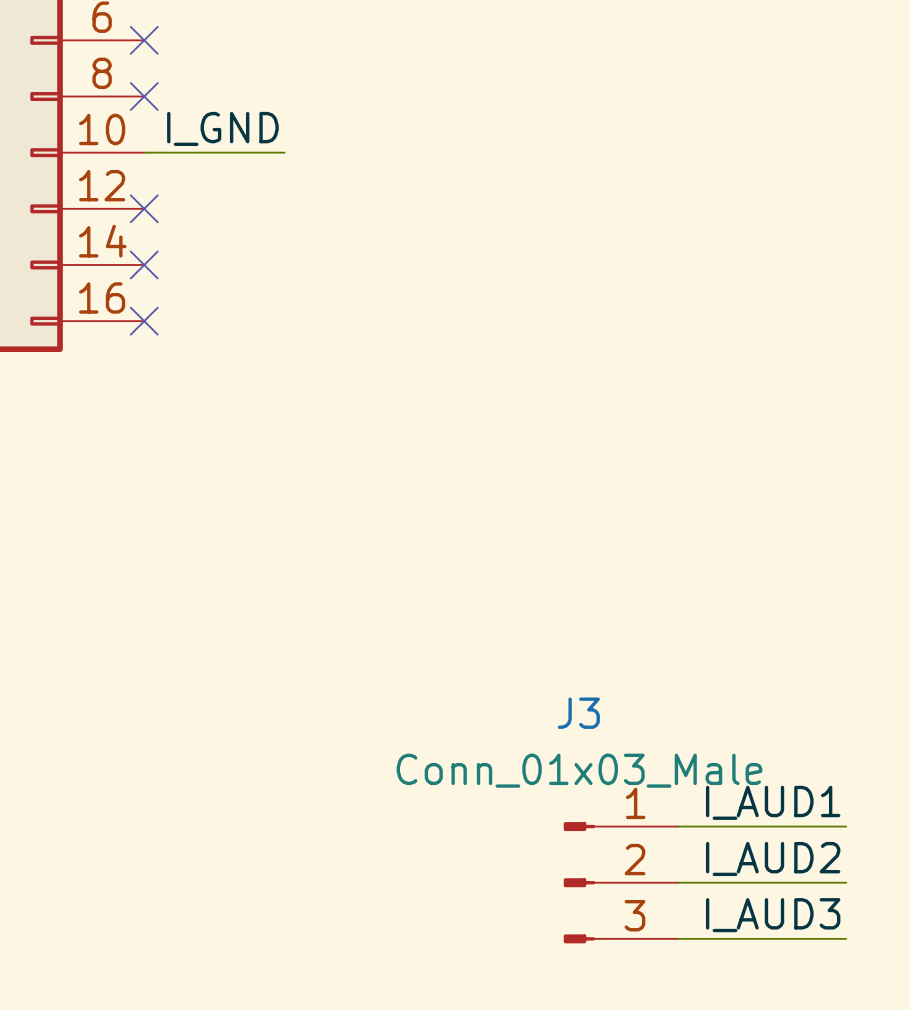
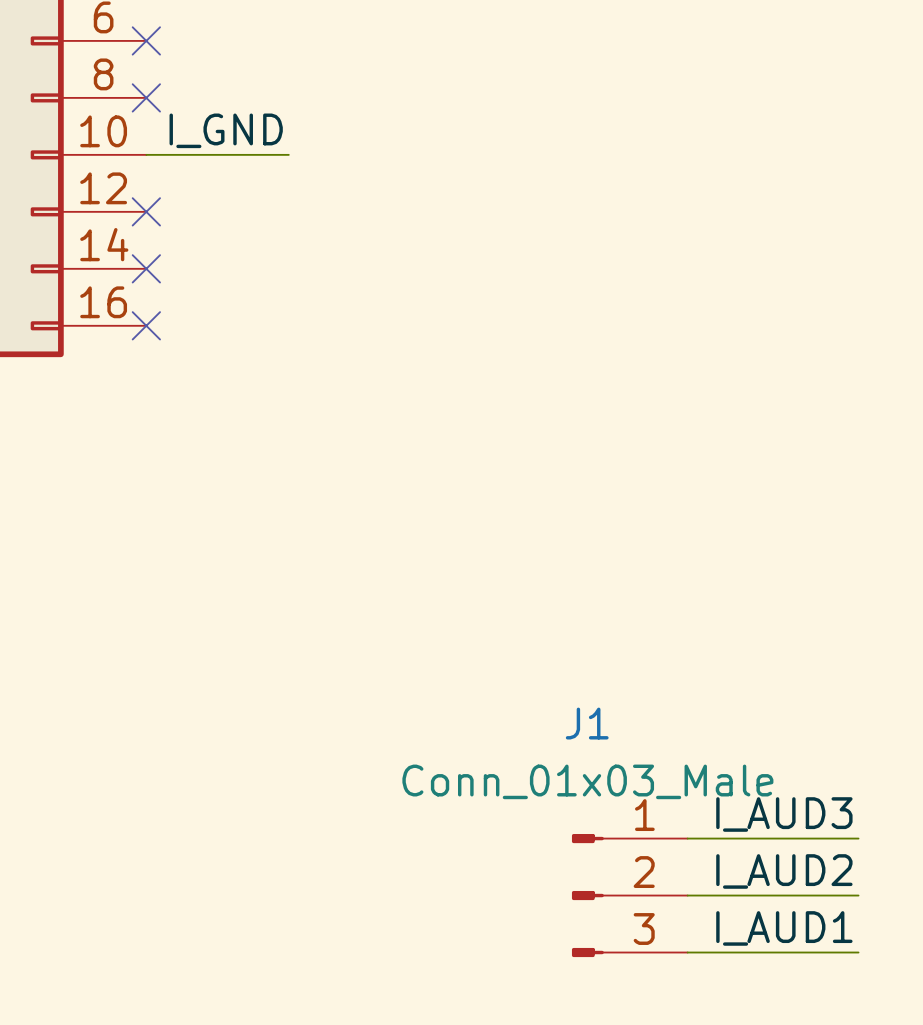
J3 name: J3 (578, 713) -> J1 (587, 723)
label: I_AUD1 (773, 802) -> I_AUD3 (784, 814)
label: I_AUD3 (773, 915) -> I_AUD1 (784, 928)

